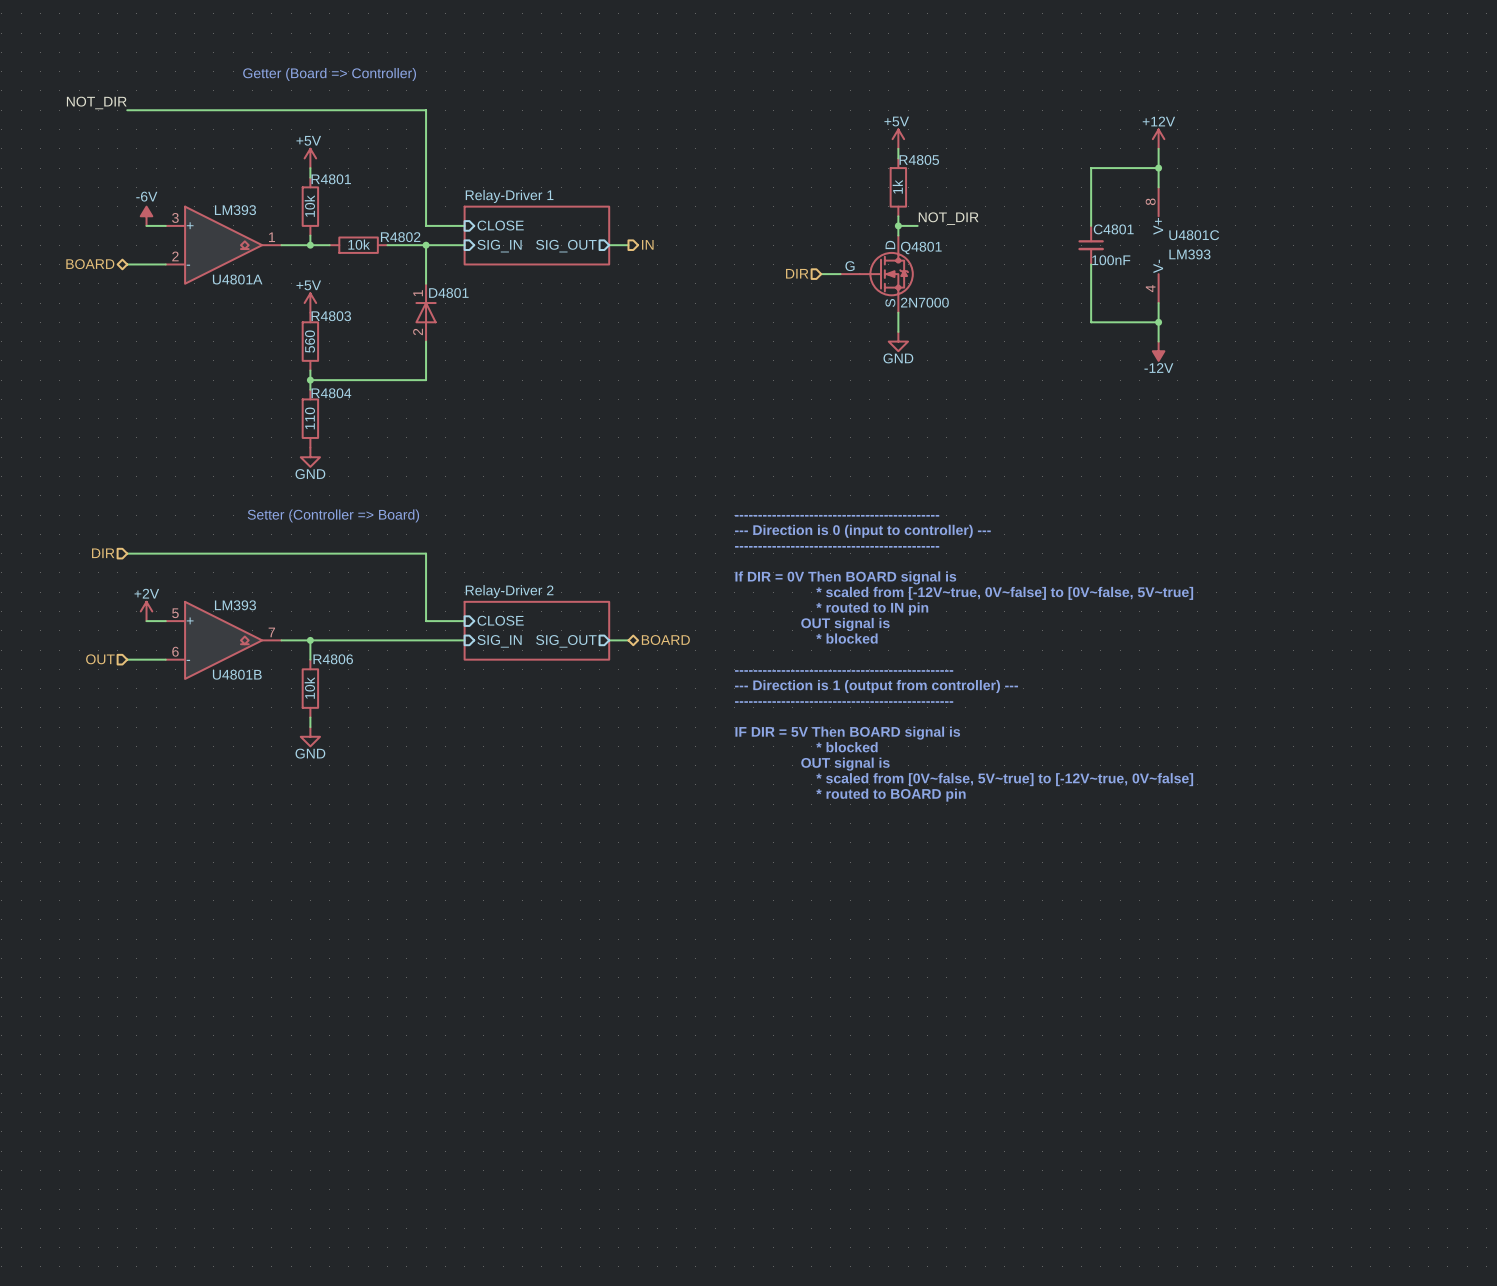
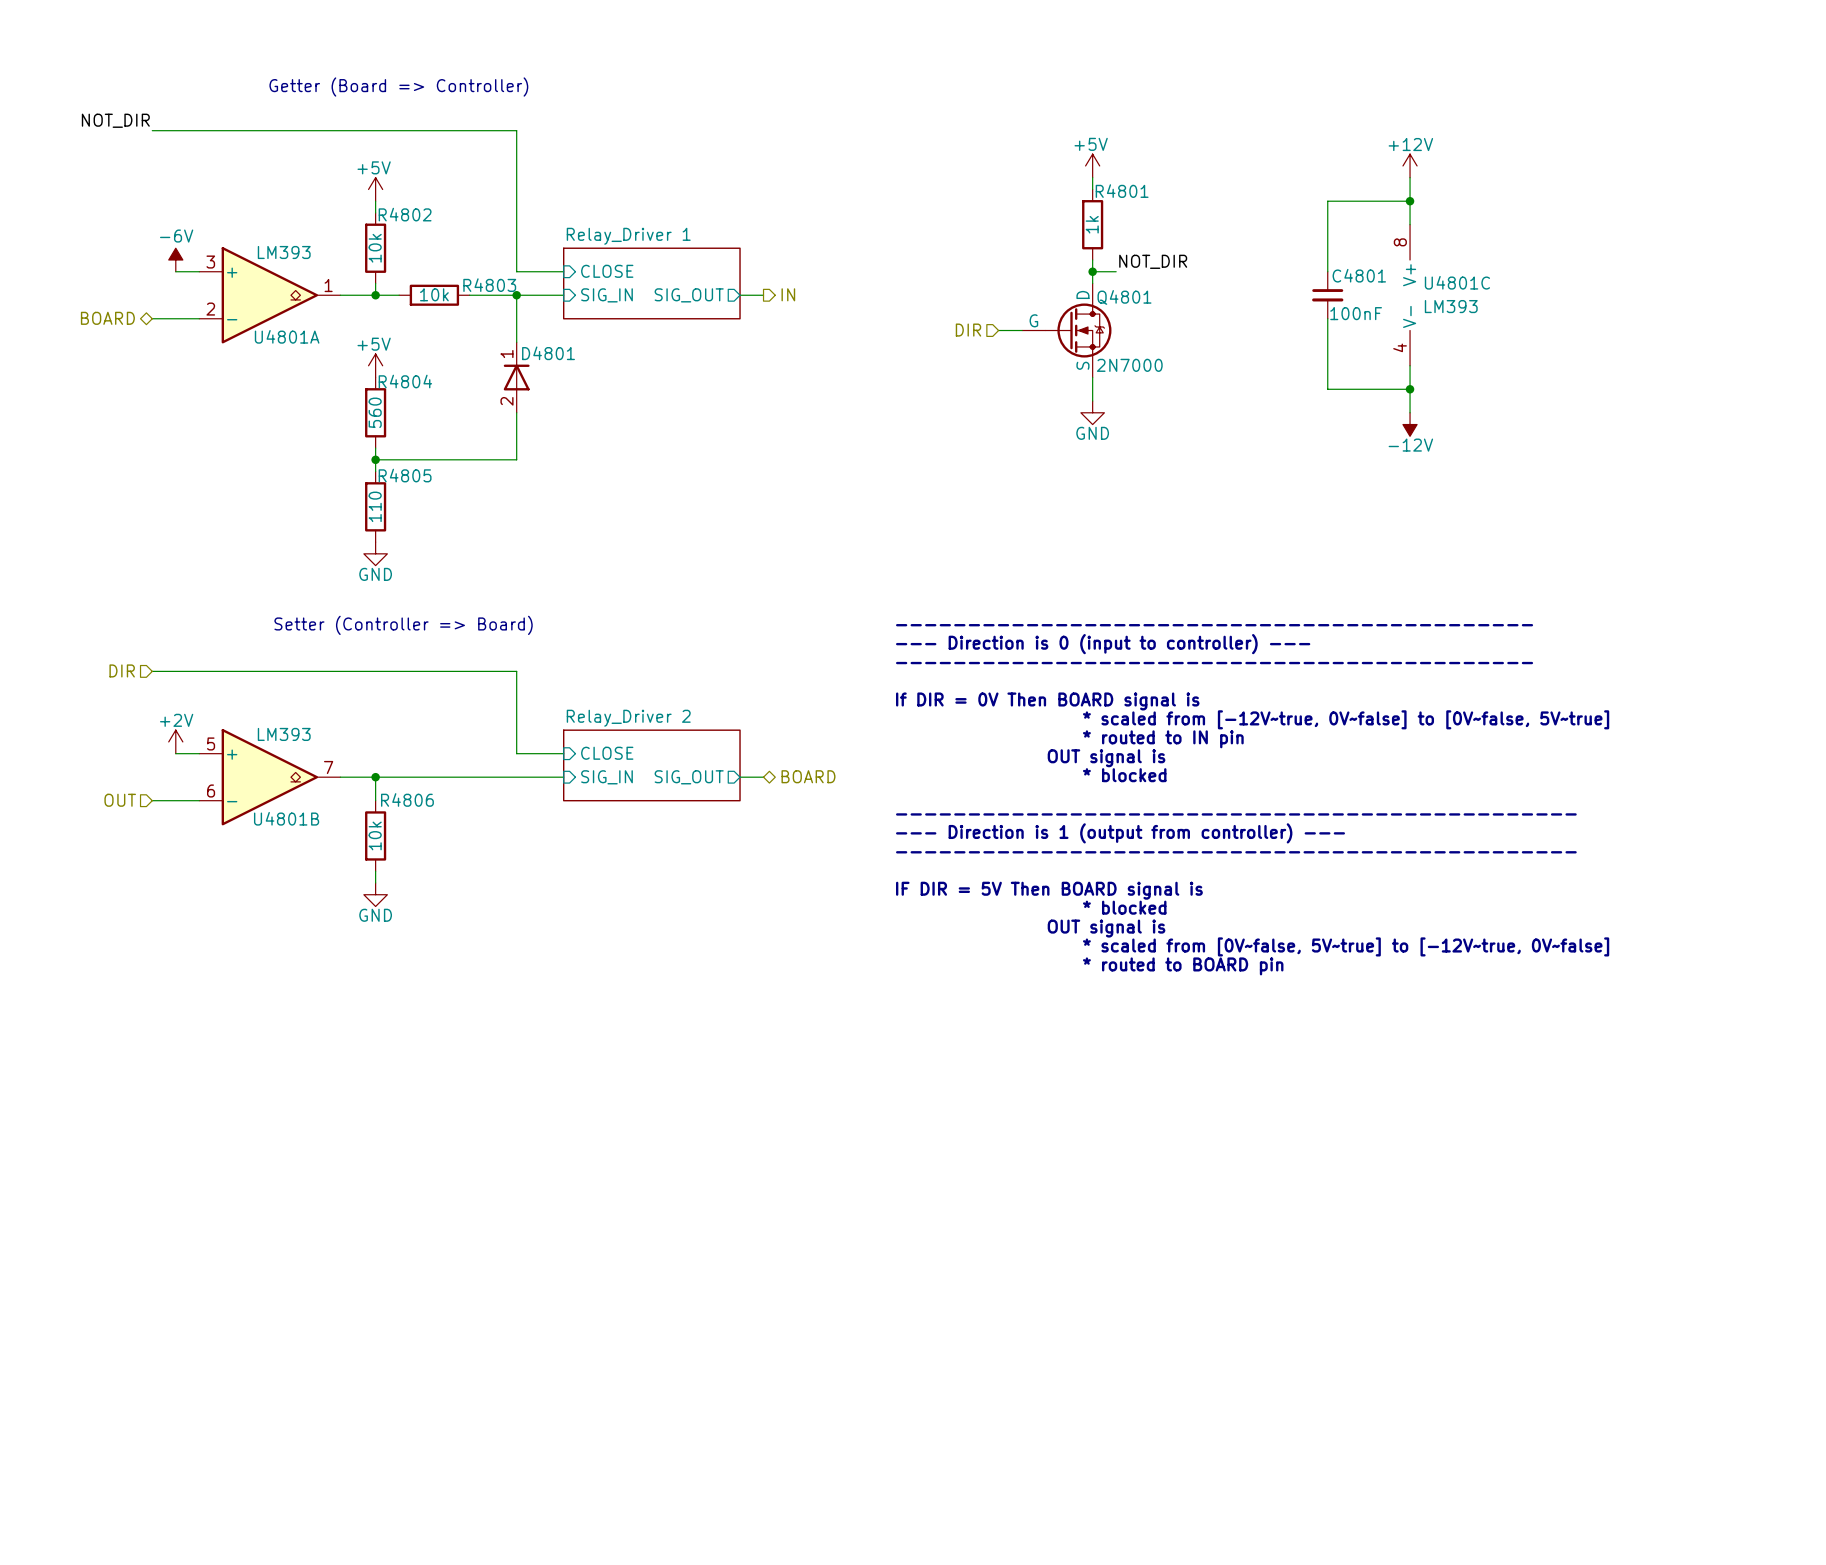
R4805 name: R4805 (919, 160) -> R4801 (1122, 191)
R4801 name: R4801 (331, 179) -> R4802 (405, 214)
sheet Relay-Driver 1 name: Relay-Driver 1 (509, 196) -> Relay_Driver 1 (628, 236)
R4802 name: R4802 (400, 237) -> R4803 (489, 285)
R4803 name: R4803 (331, 316) -> R4804 (405, 381)
R4804 name: R4804 (331, 393) -> R4805 (405, 475)
sheet Relay-Driver 2 name: Relay-Driver 2 (509, 591) -> Relay_Driver 2 (628, 718)

